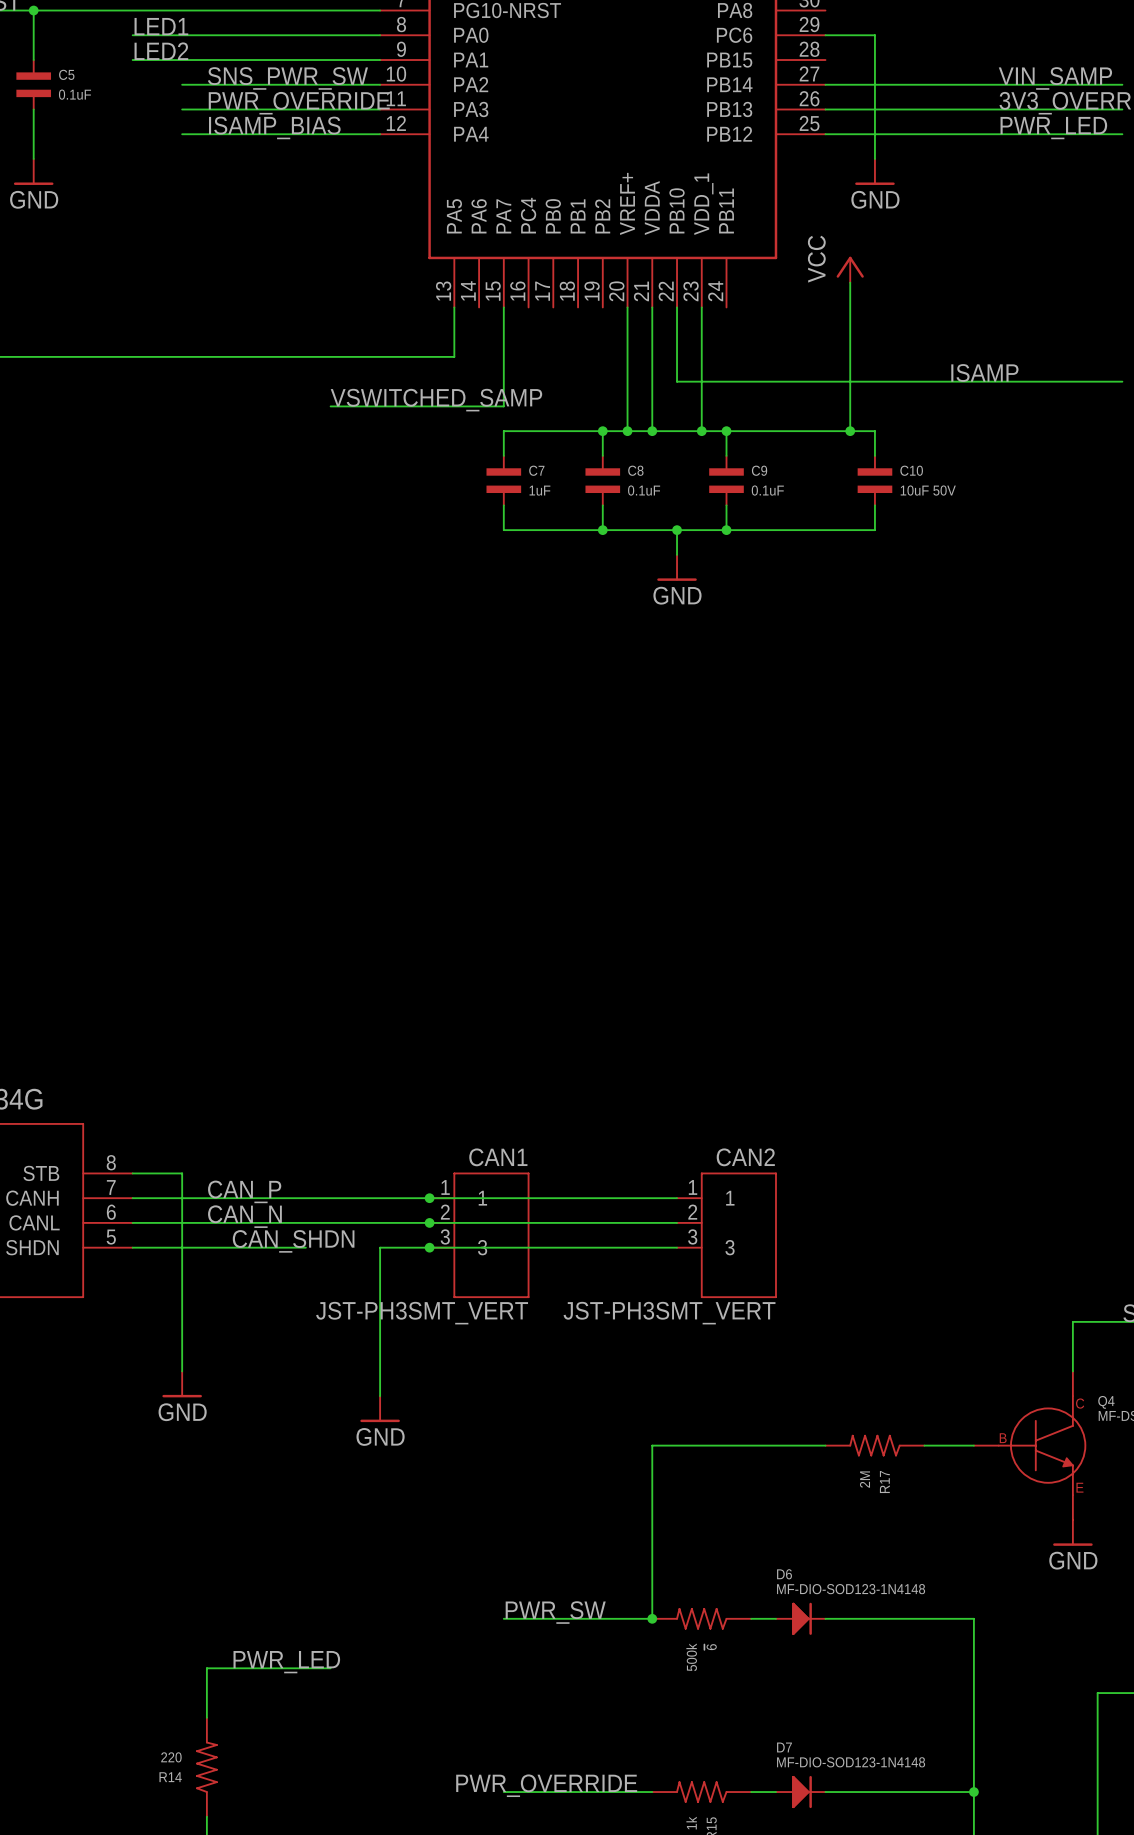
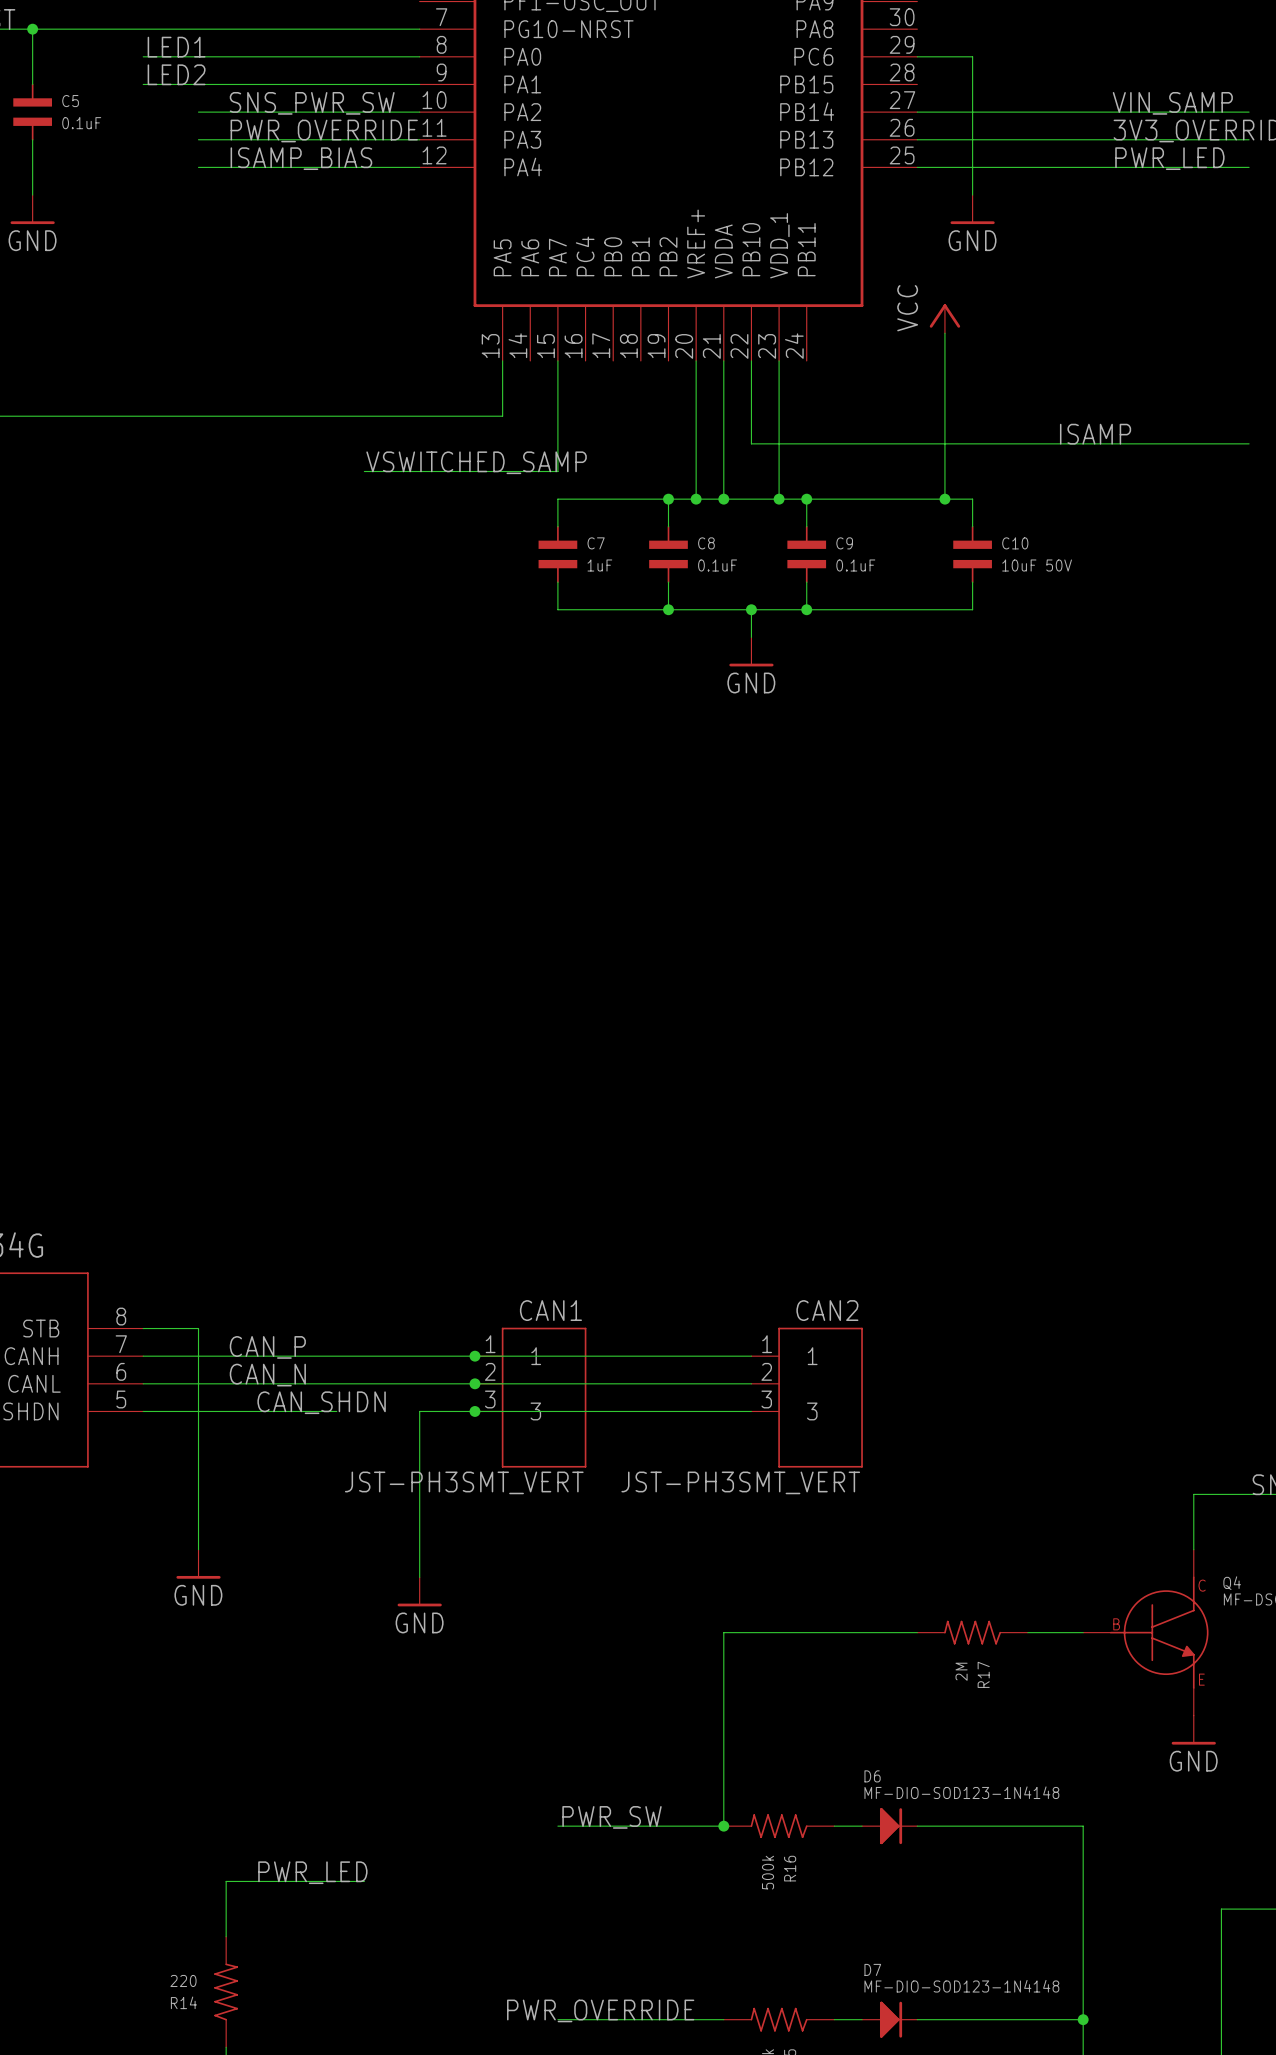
~{6} name: ~{6} (710, 1647) -> R16 (790, 1868)

